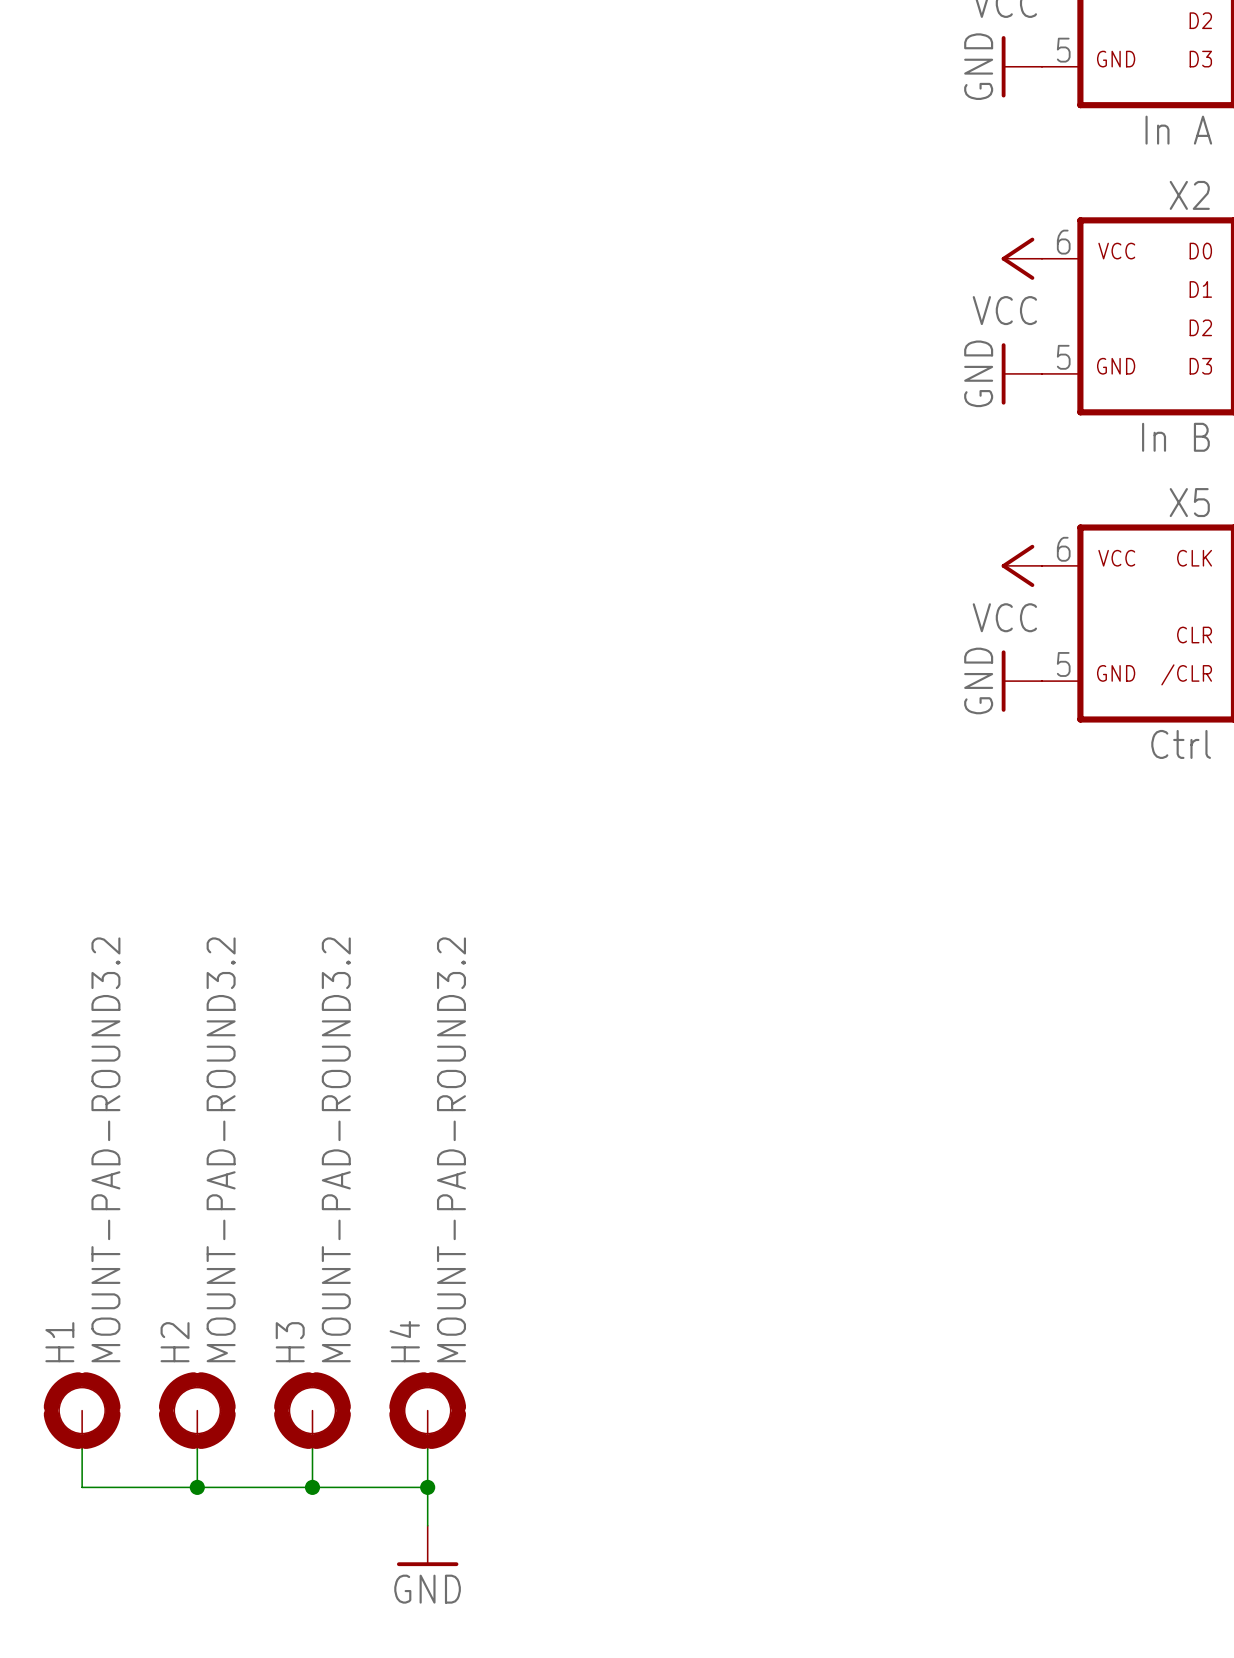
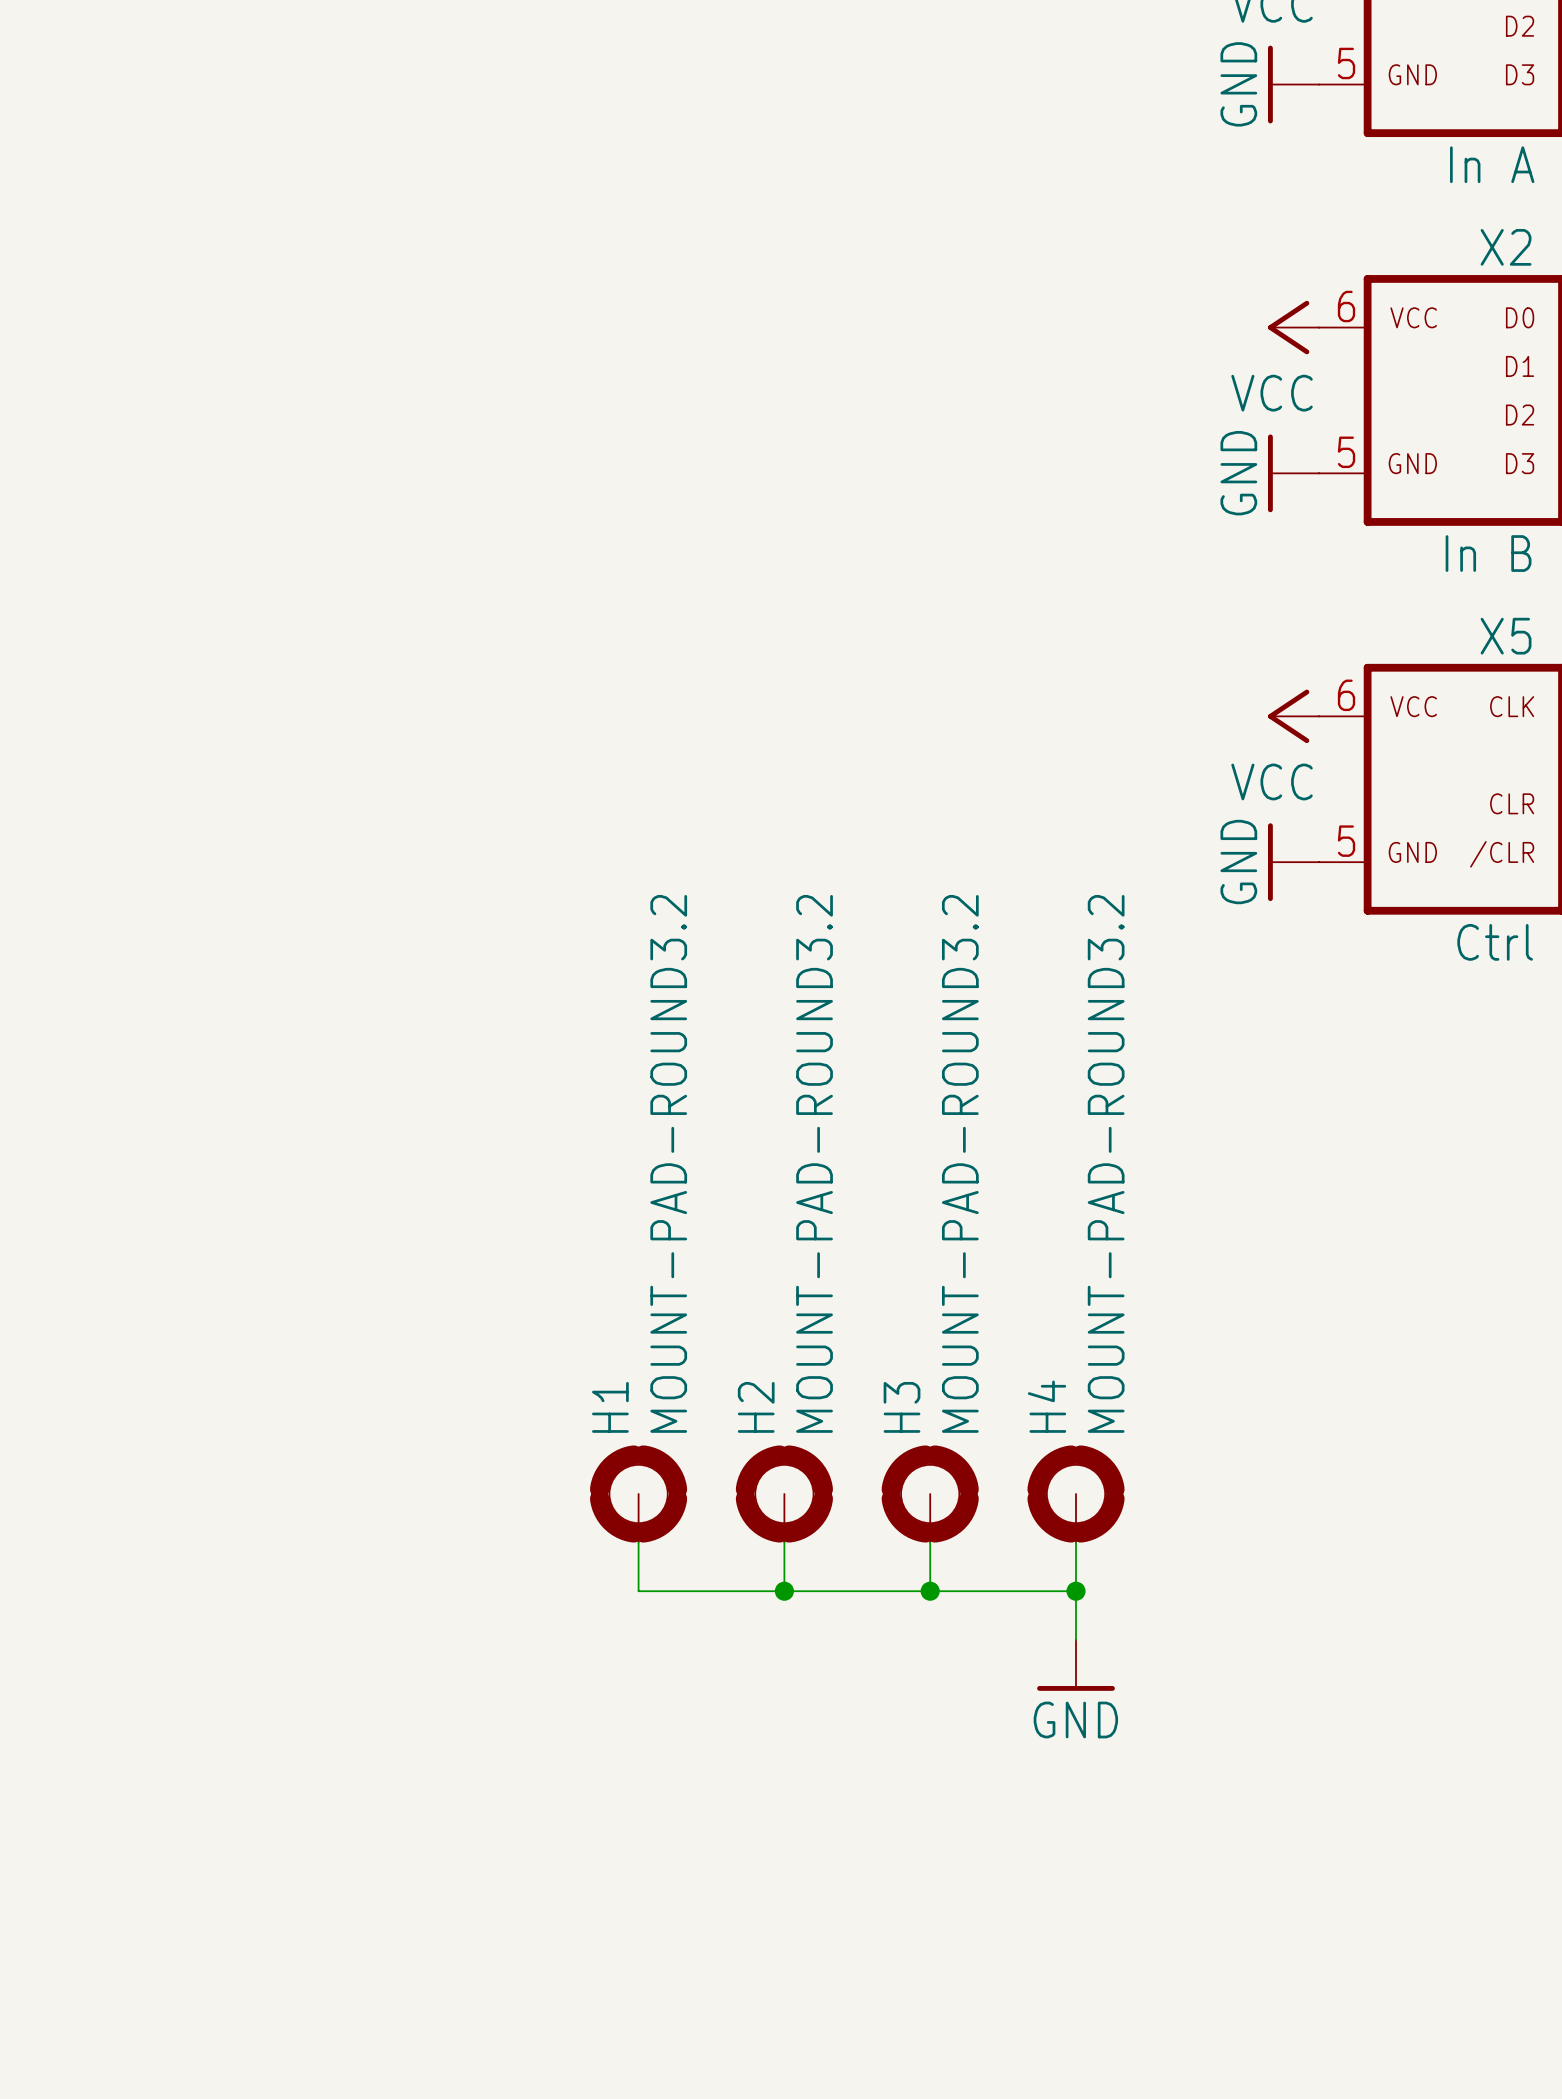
wire: none -> (638, 1542) (638, 1591) (1076, 1591)
wire: none -> (784, 1542) (784, 1591)
wire: none -> (930, 1542) (930, 1591)
wire: none -> (1076, 1542) (1076, 1639)
junction: none -> (784, 1591)
junction: none -> (930, 1591)
junction: none -> (1076, 1591)
power symbol: none -> GND (1076, 1665)
H1 position: (82, 1410) -> (638, 1494)
H2 position: (197, 1410) -> (784, 1494)
H3 position: (312, 1410) -> (930, 1494)
H4 position: (427, 1410) -> (1076, 1494)
wire: (82, 1449) (82, 1487) (427, 1487) -> none
wire: (197, 1449) (197, 1487) -> none
wire: (312, 1449) (312, 1487) -> none
wire: (427, 1449) (427, 1525) -> none
junction: (197, 1487) -> none
junction: (312, 1487) -> none
junction: (427, 1487) -> none
power symbol: GND (427, 1545) -> none

